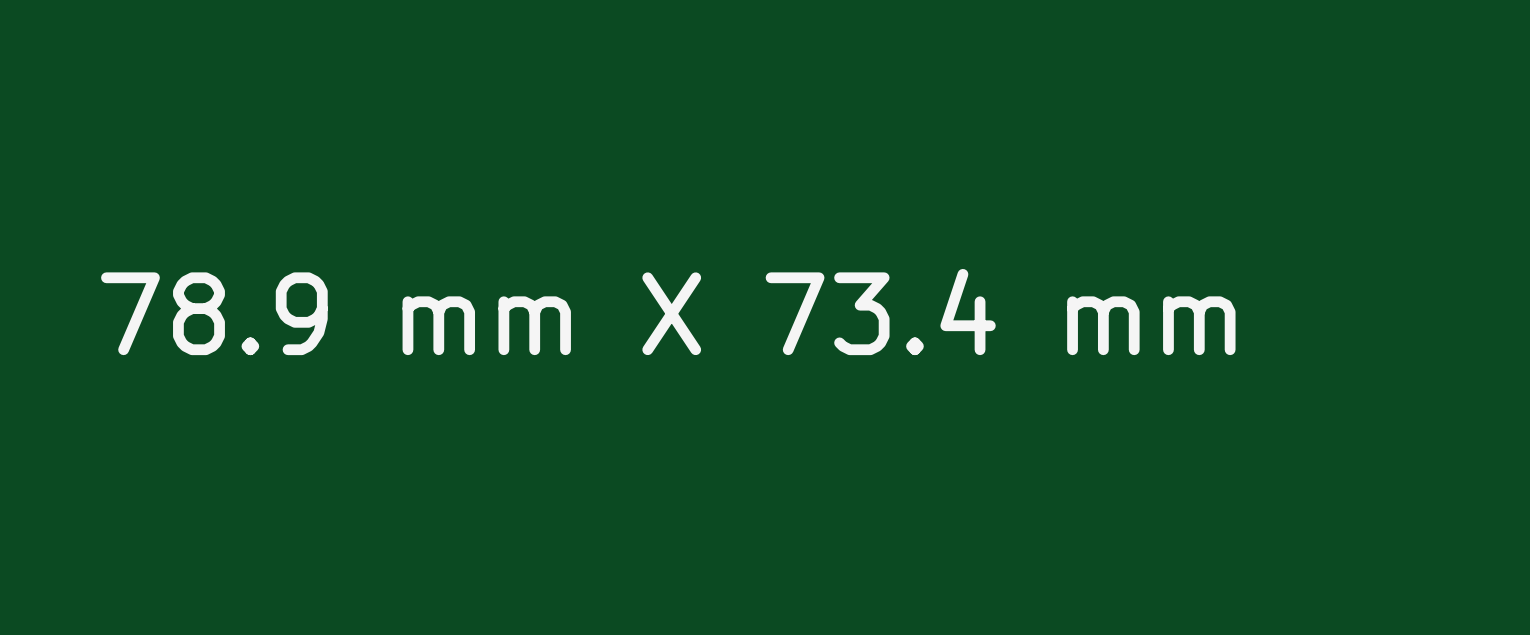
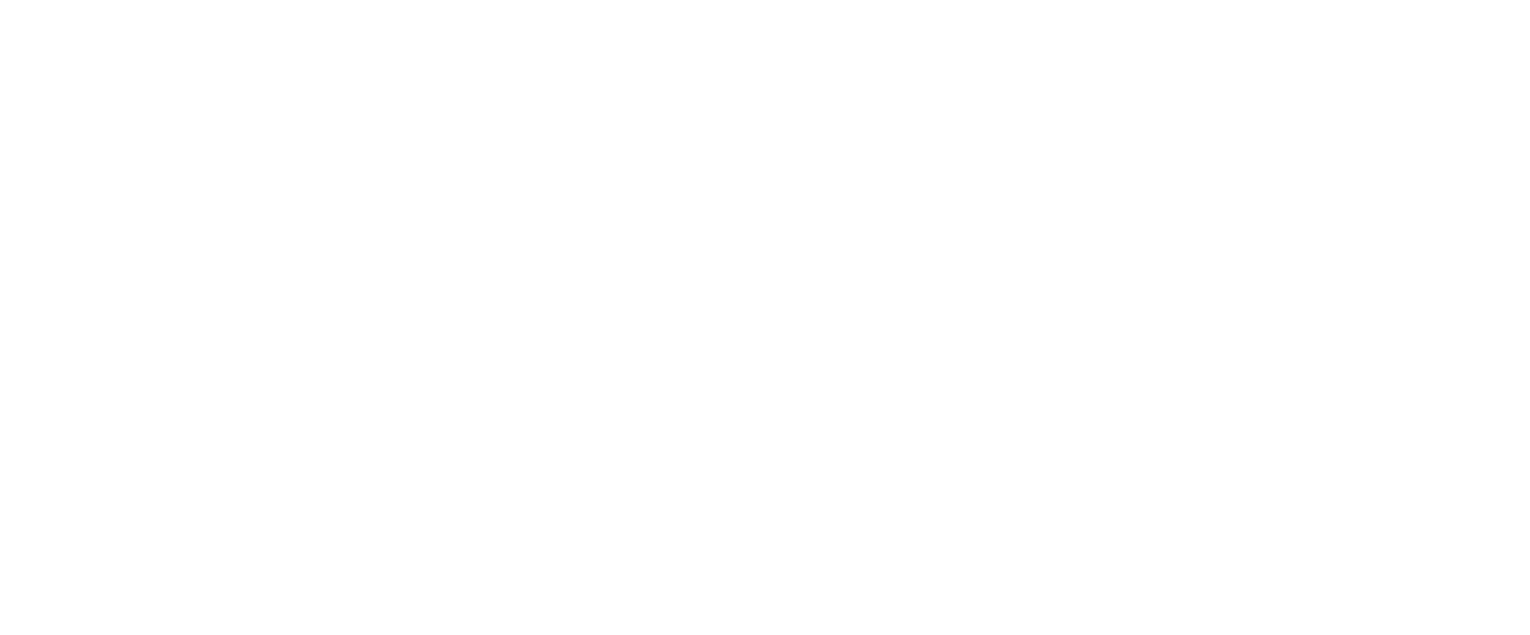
text: 78.9 mm X 73.4 mm (668, 312) -> none

